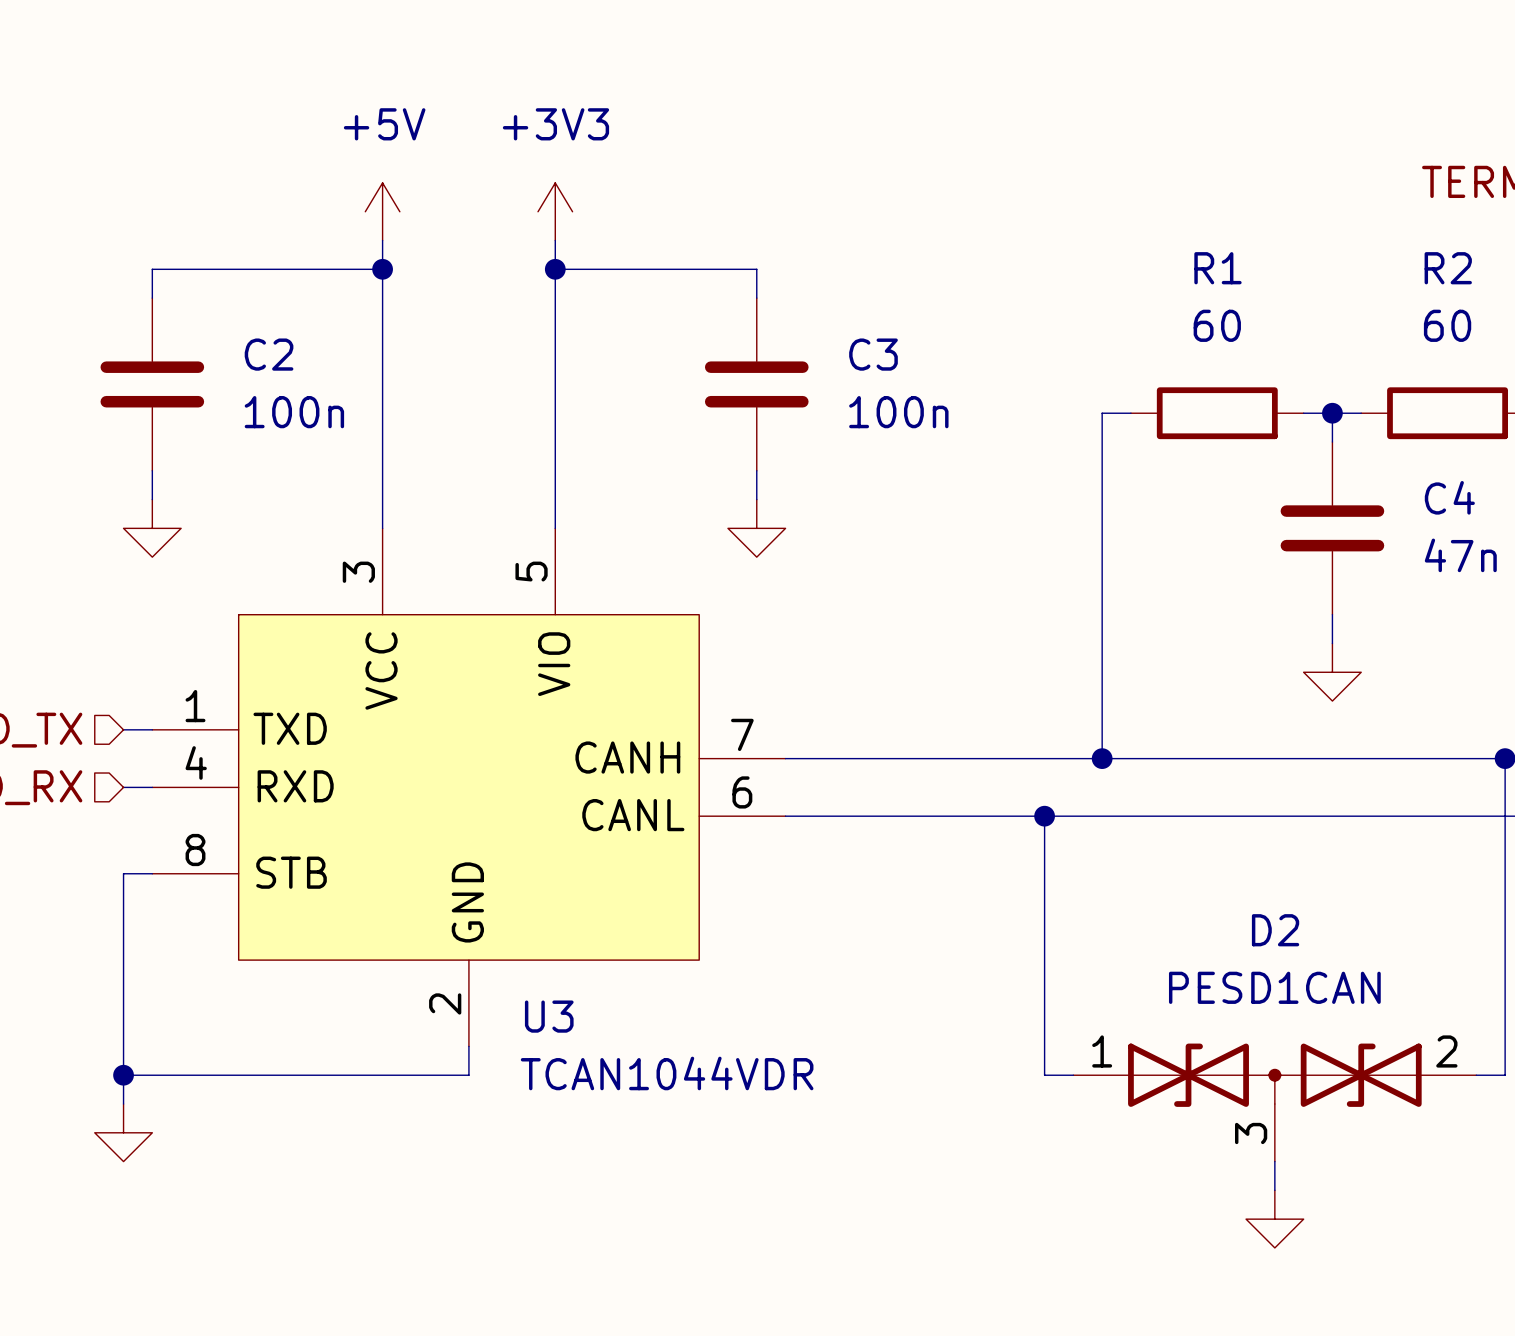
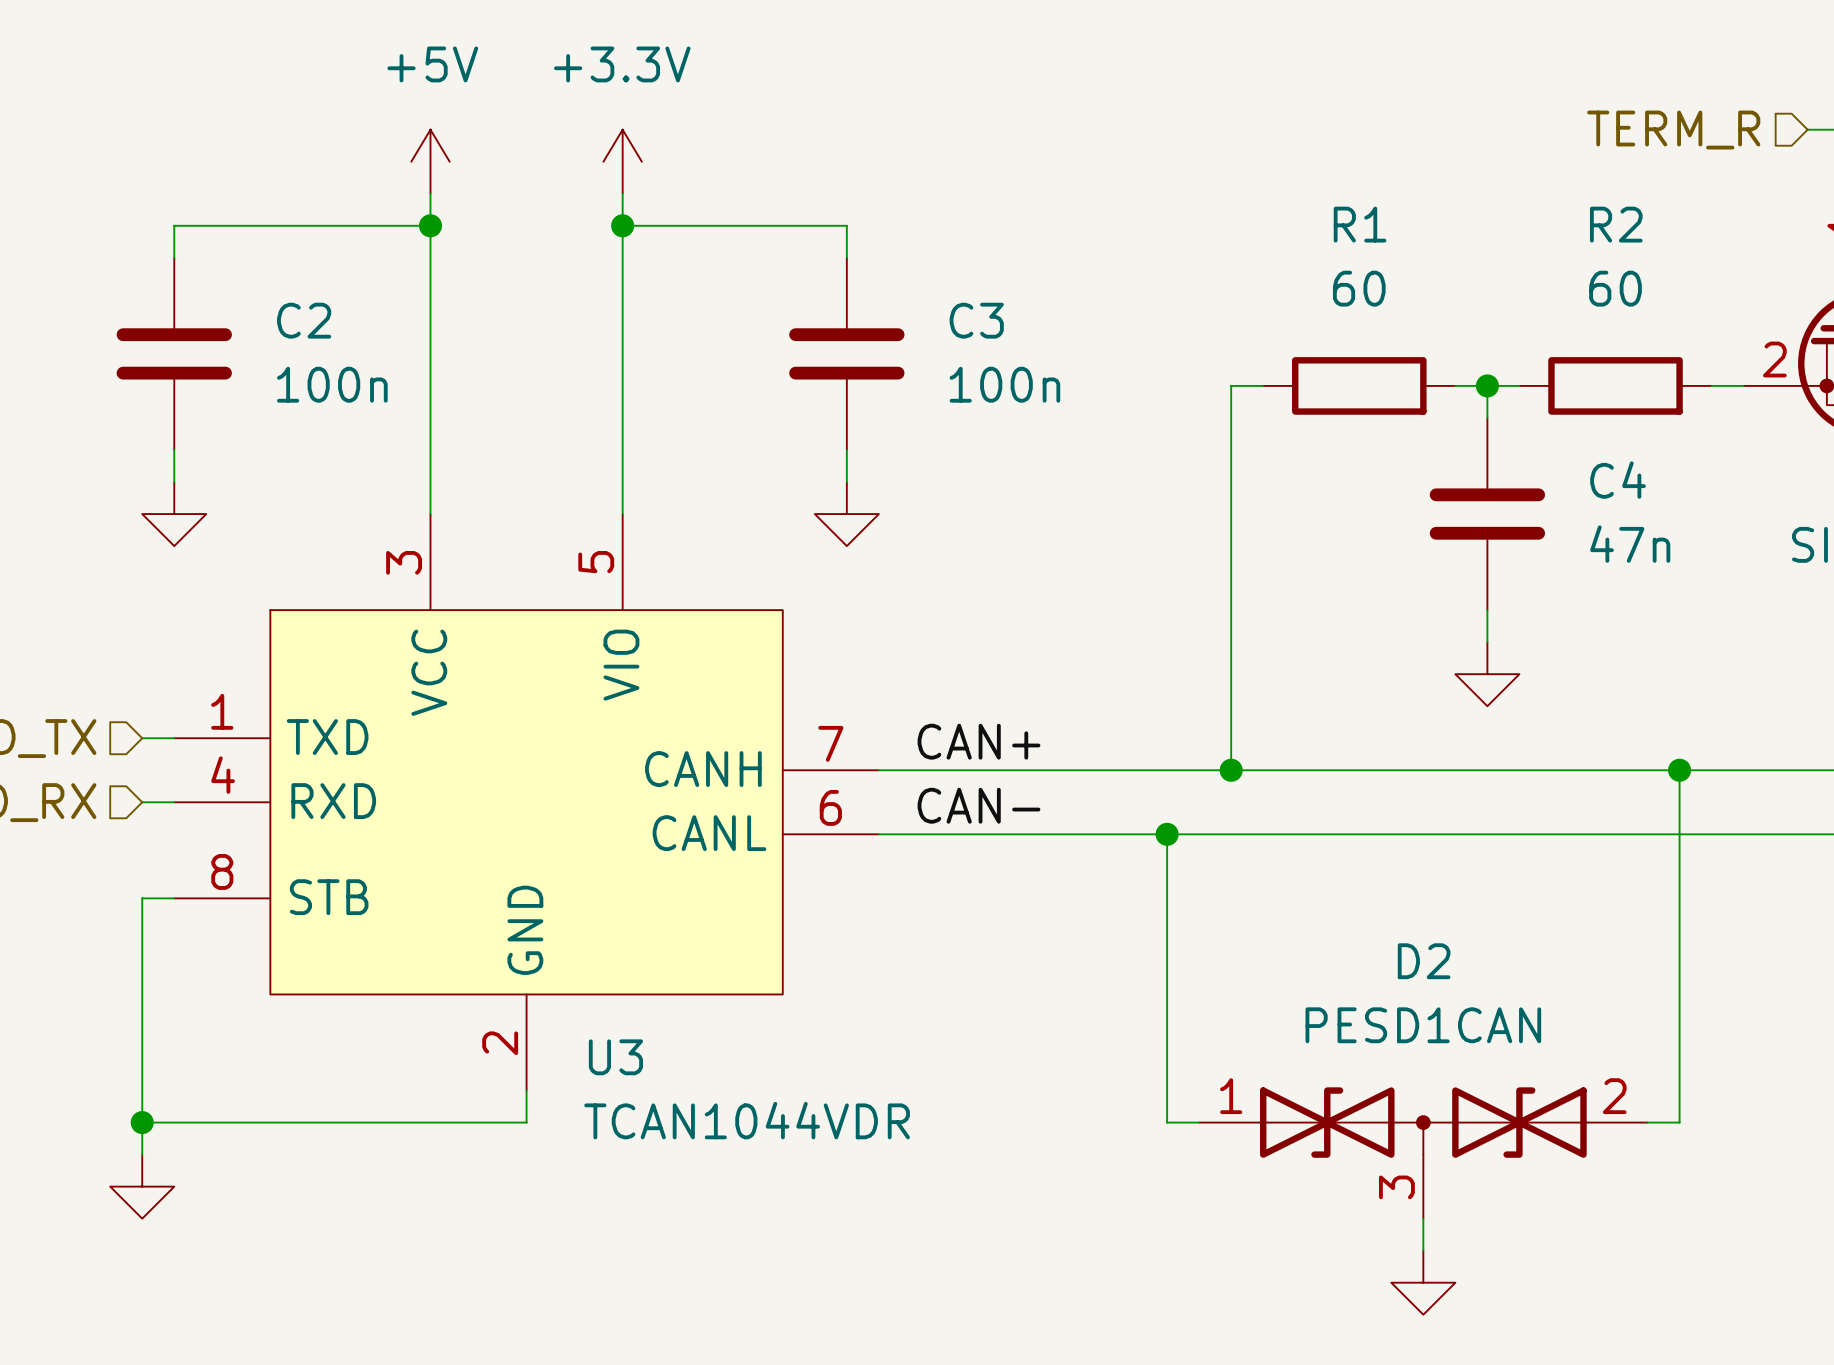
power symbol: +3V3 (555, 211) -> +3.3V (622, 161)
label: none -> CAN+ (979, 741)
label: none -> CAN- (979, 805)

